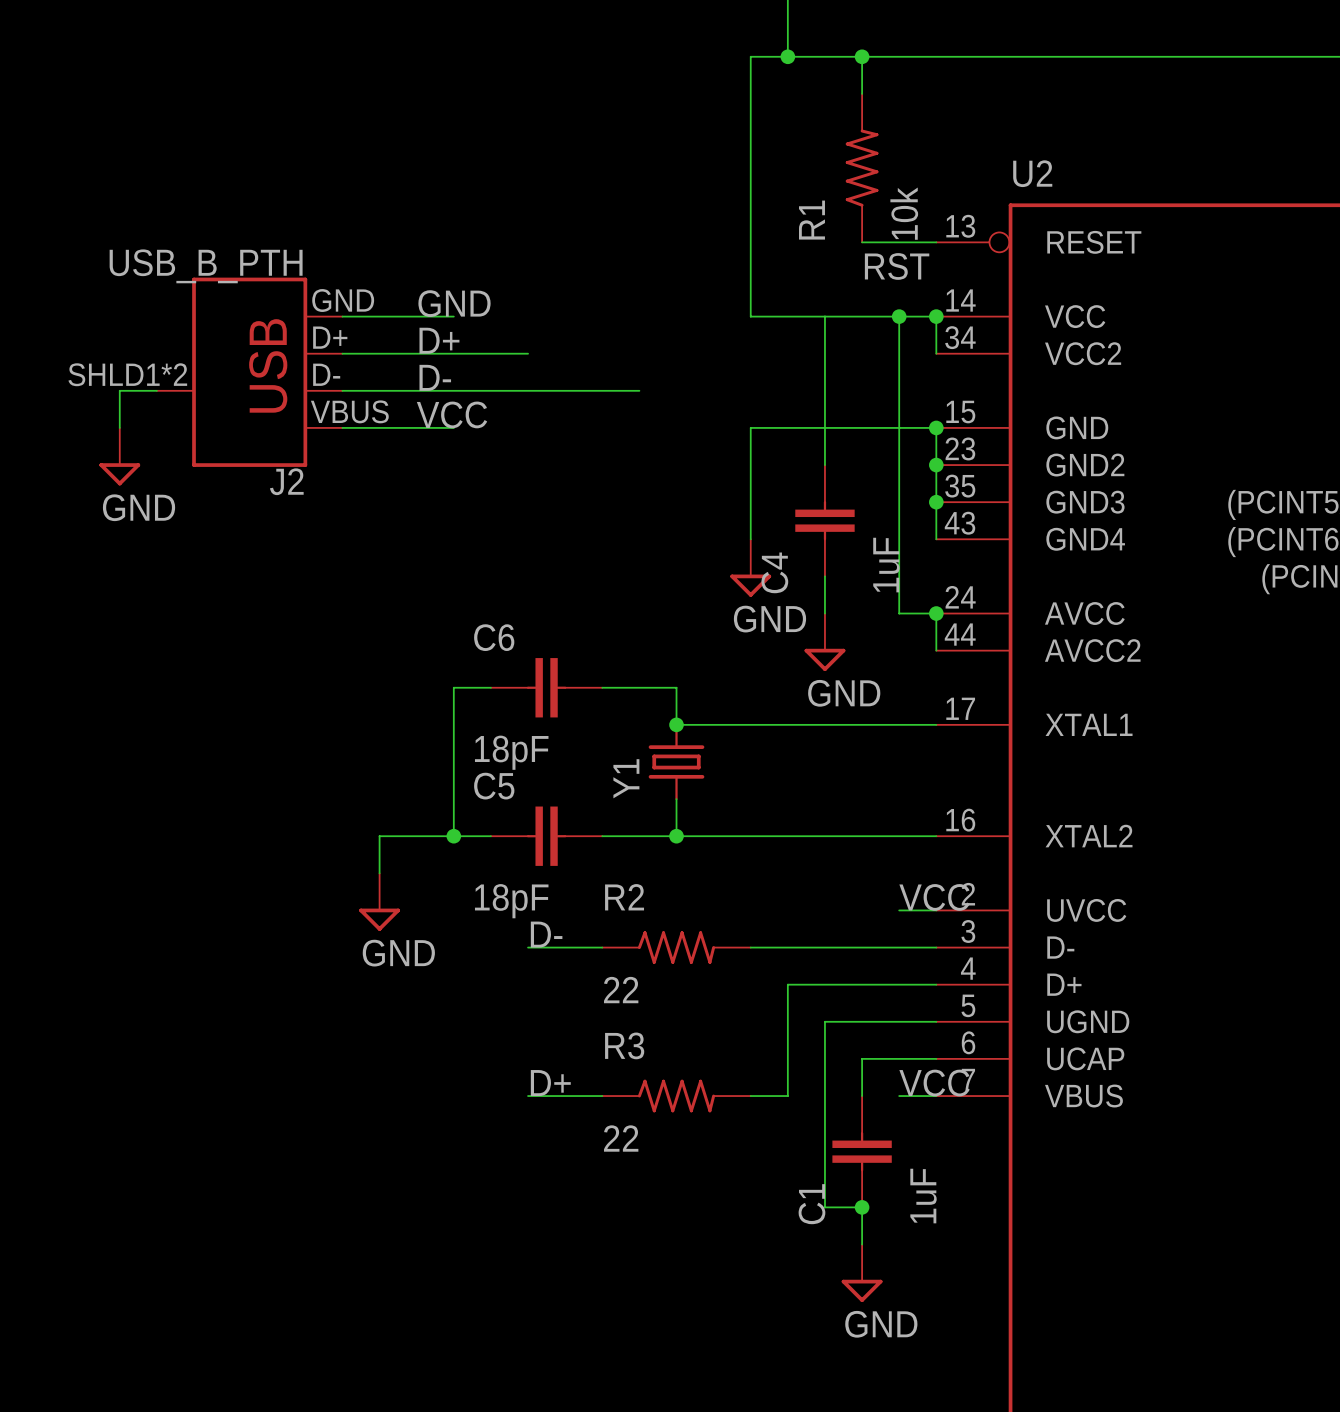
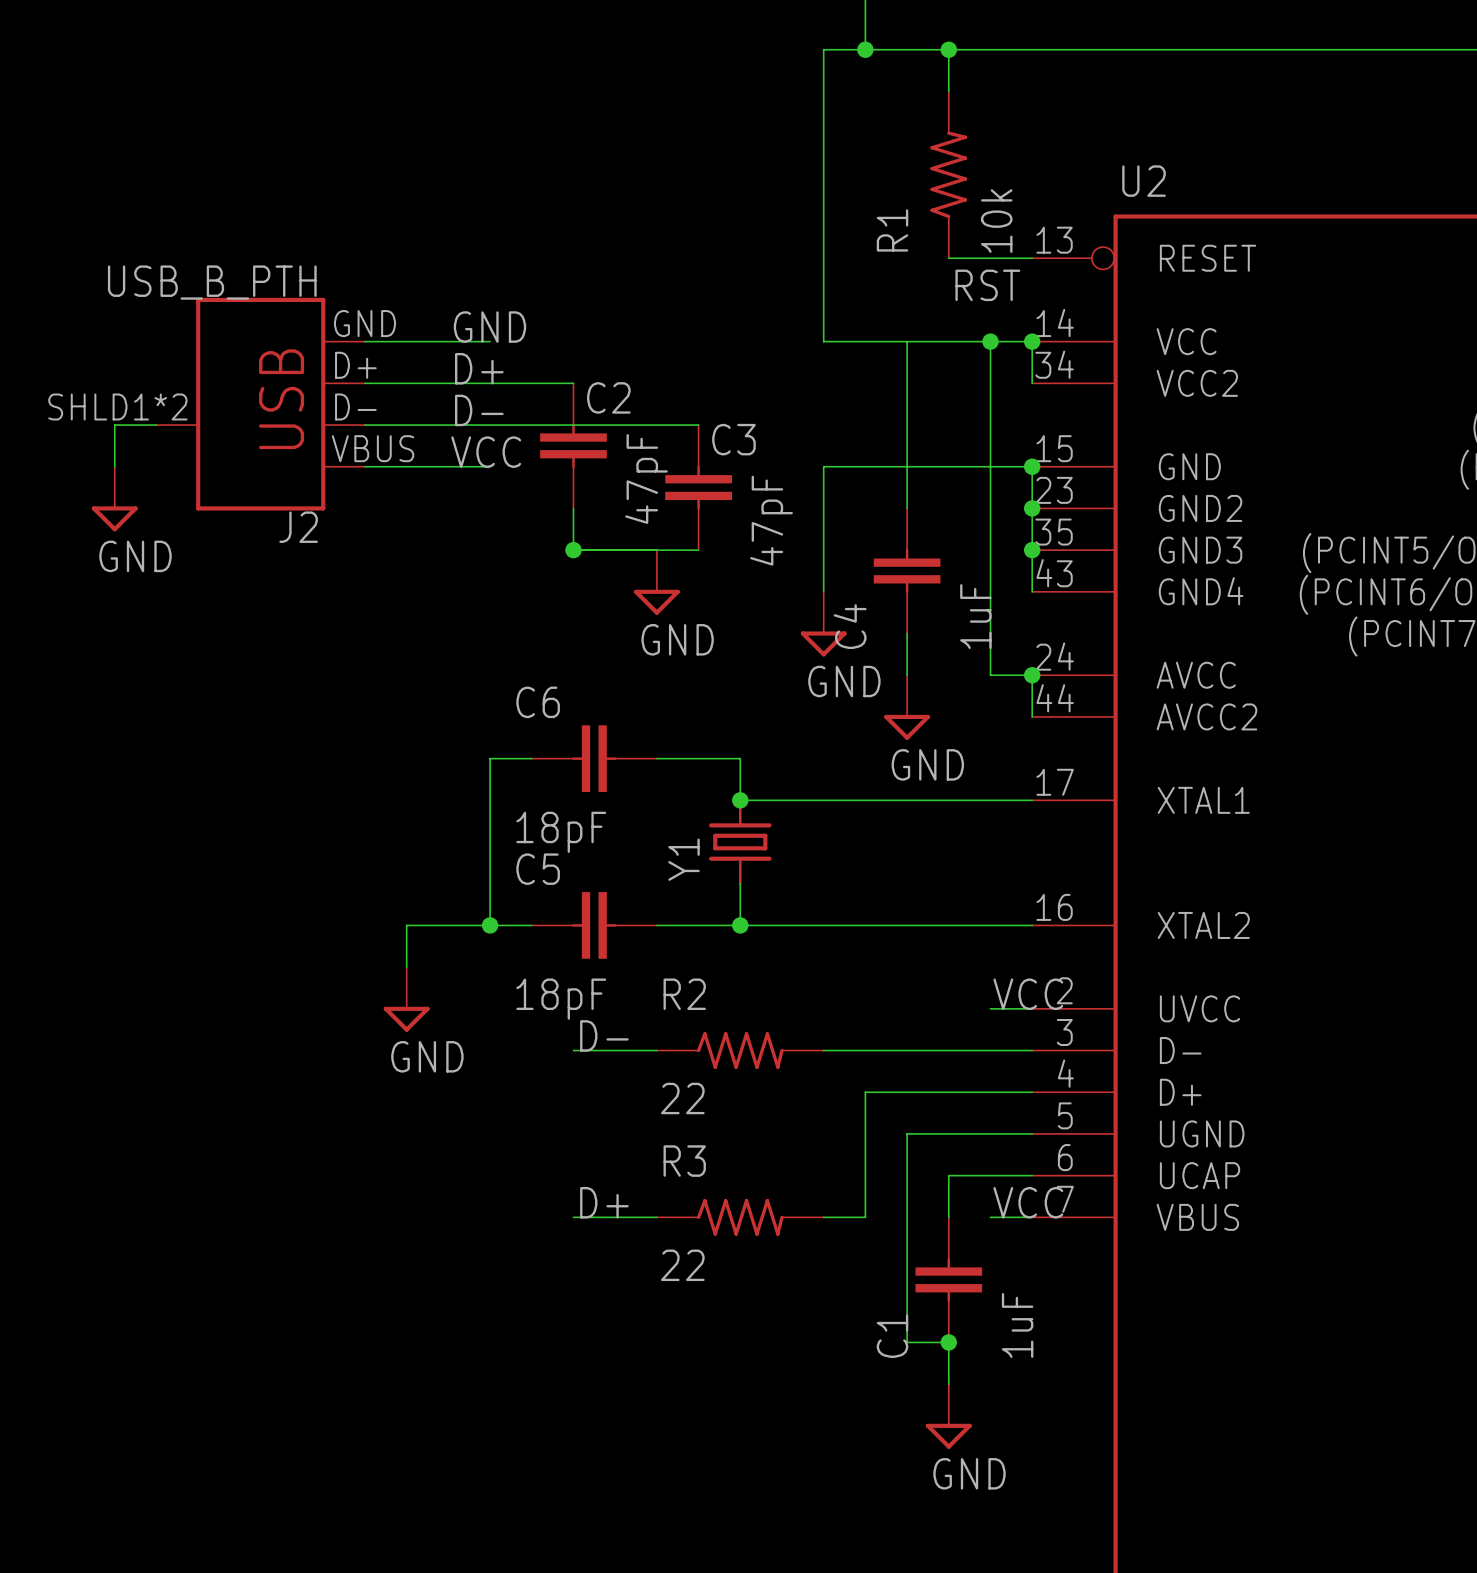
C2: none -> 47pF (573, 445)
C3: none -> 47pF (698, 487)
wire: none -> (573, 508) (573, 550) (698, 550)
junction: none -> (573, 550)
power symbol: none -> GND (656, 582)

